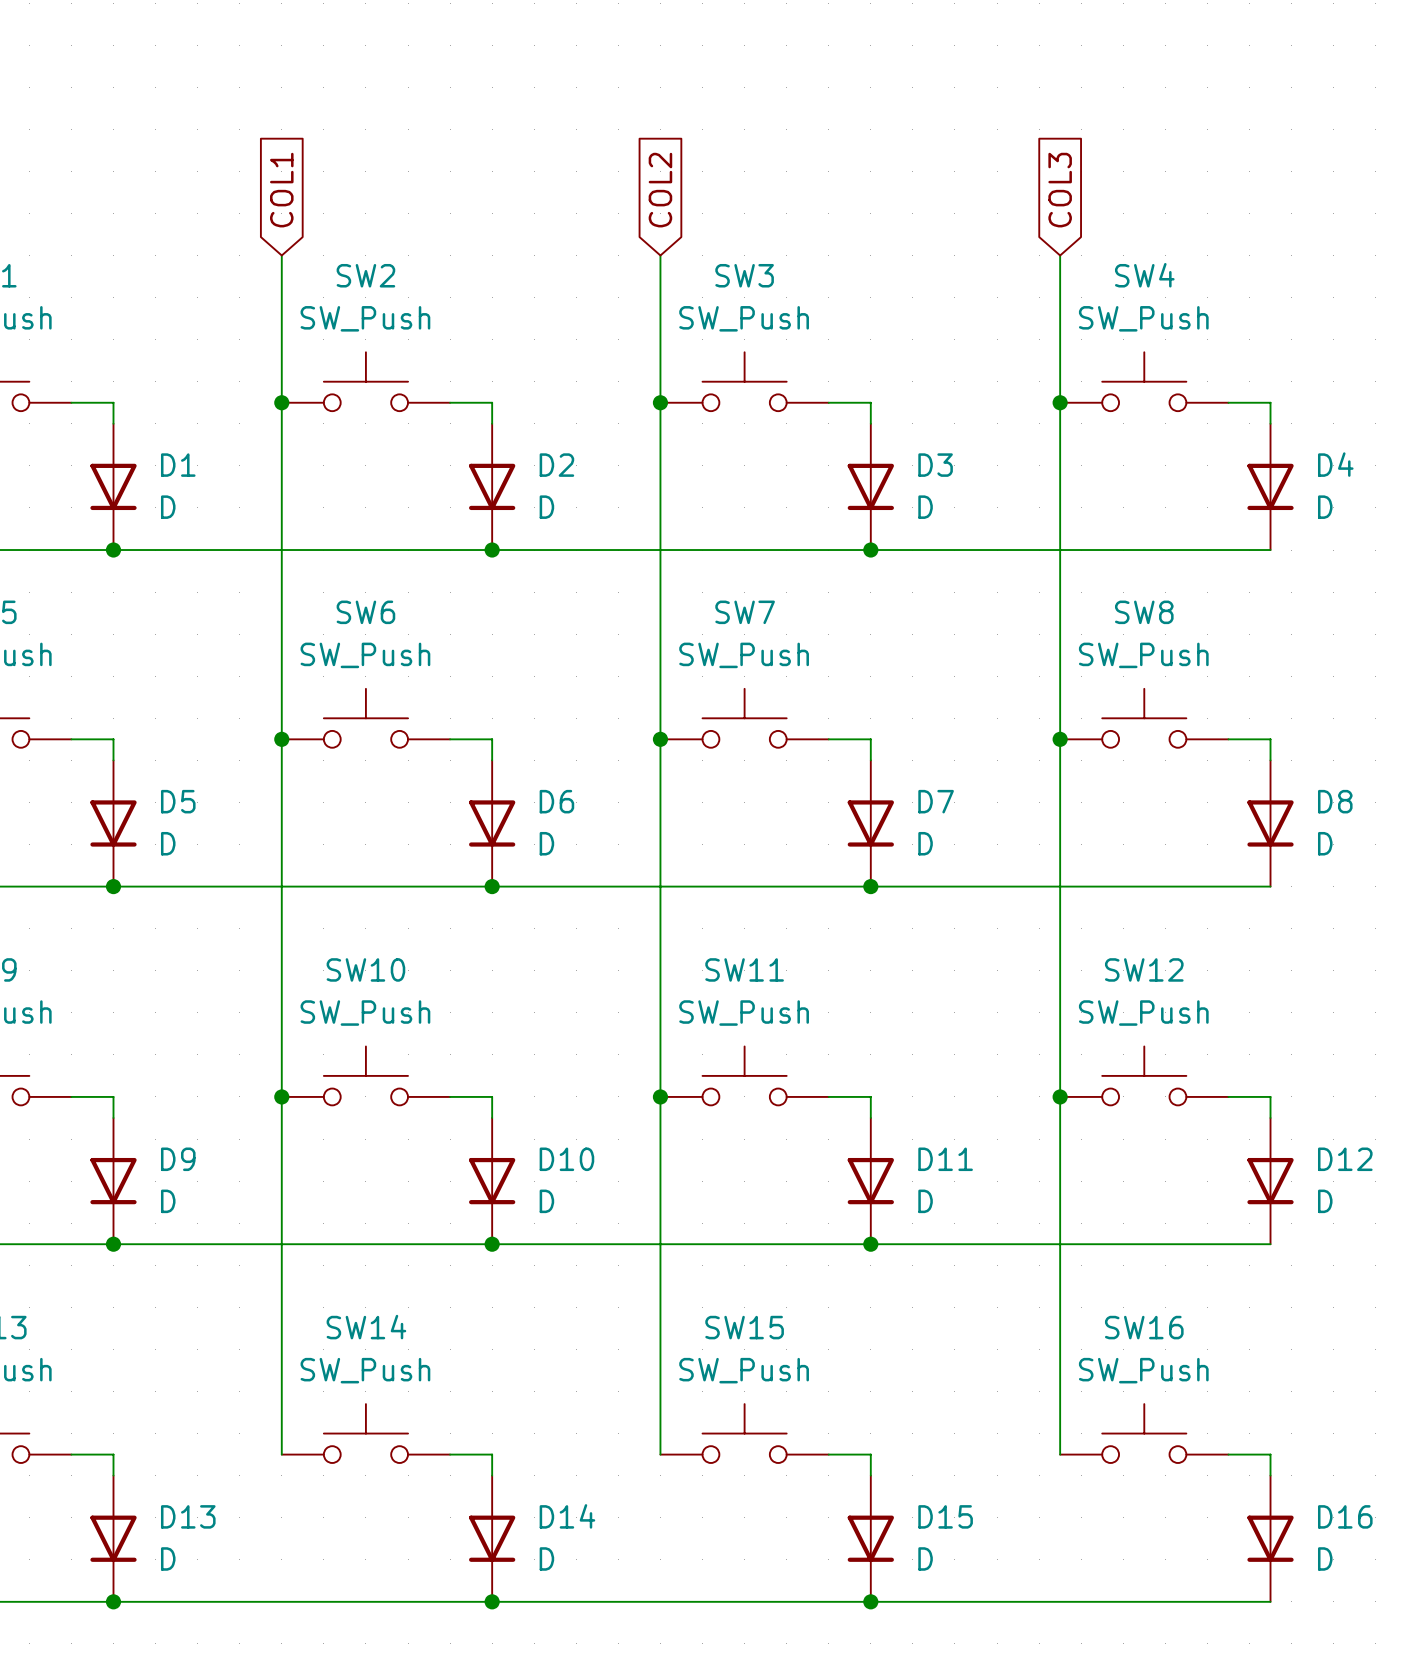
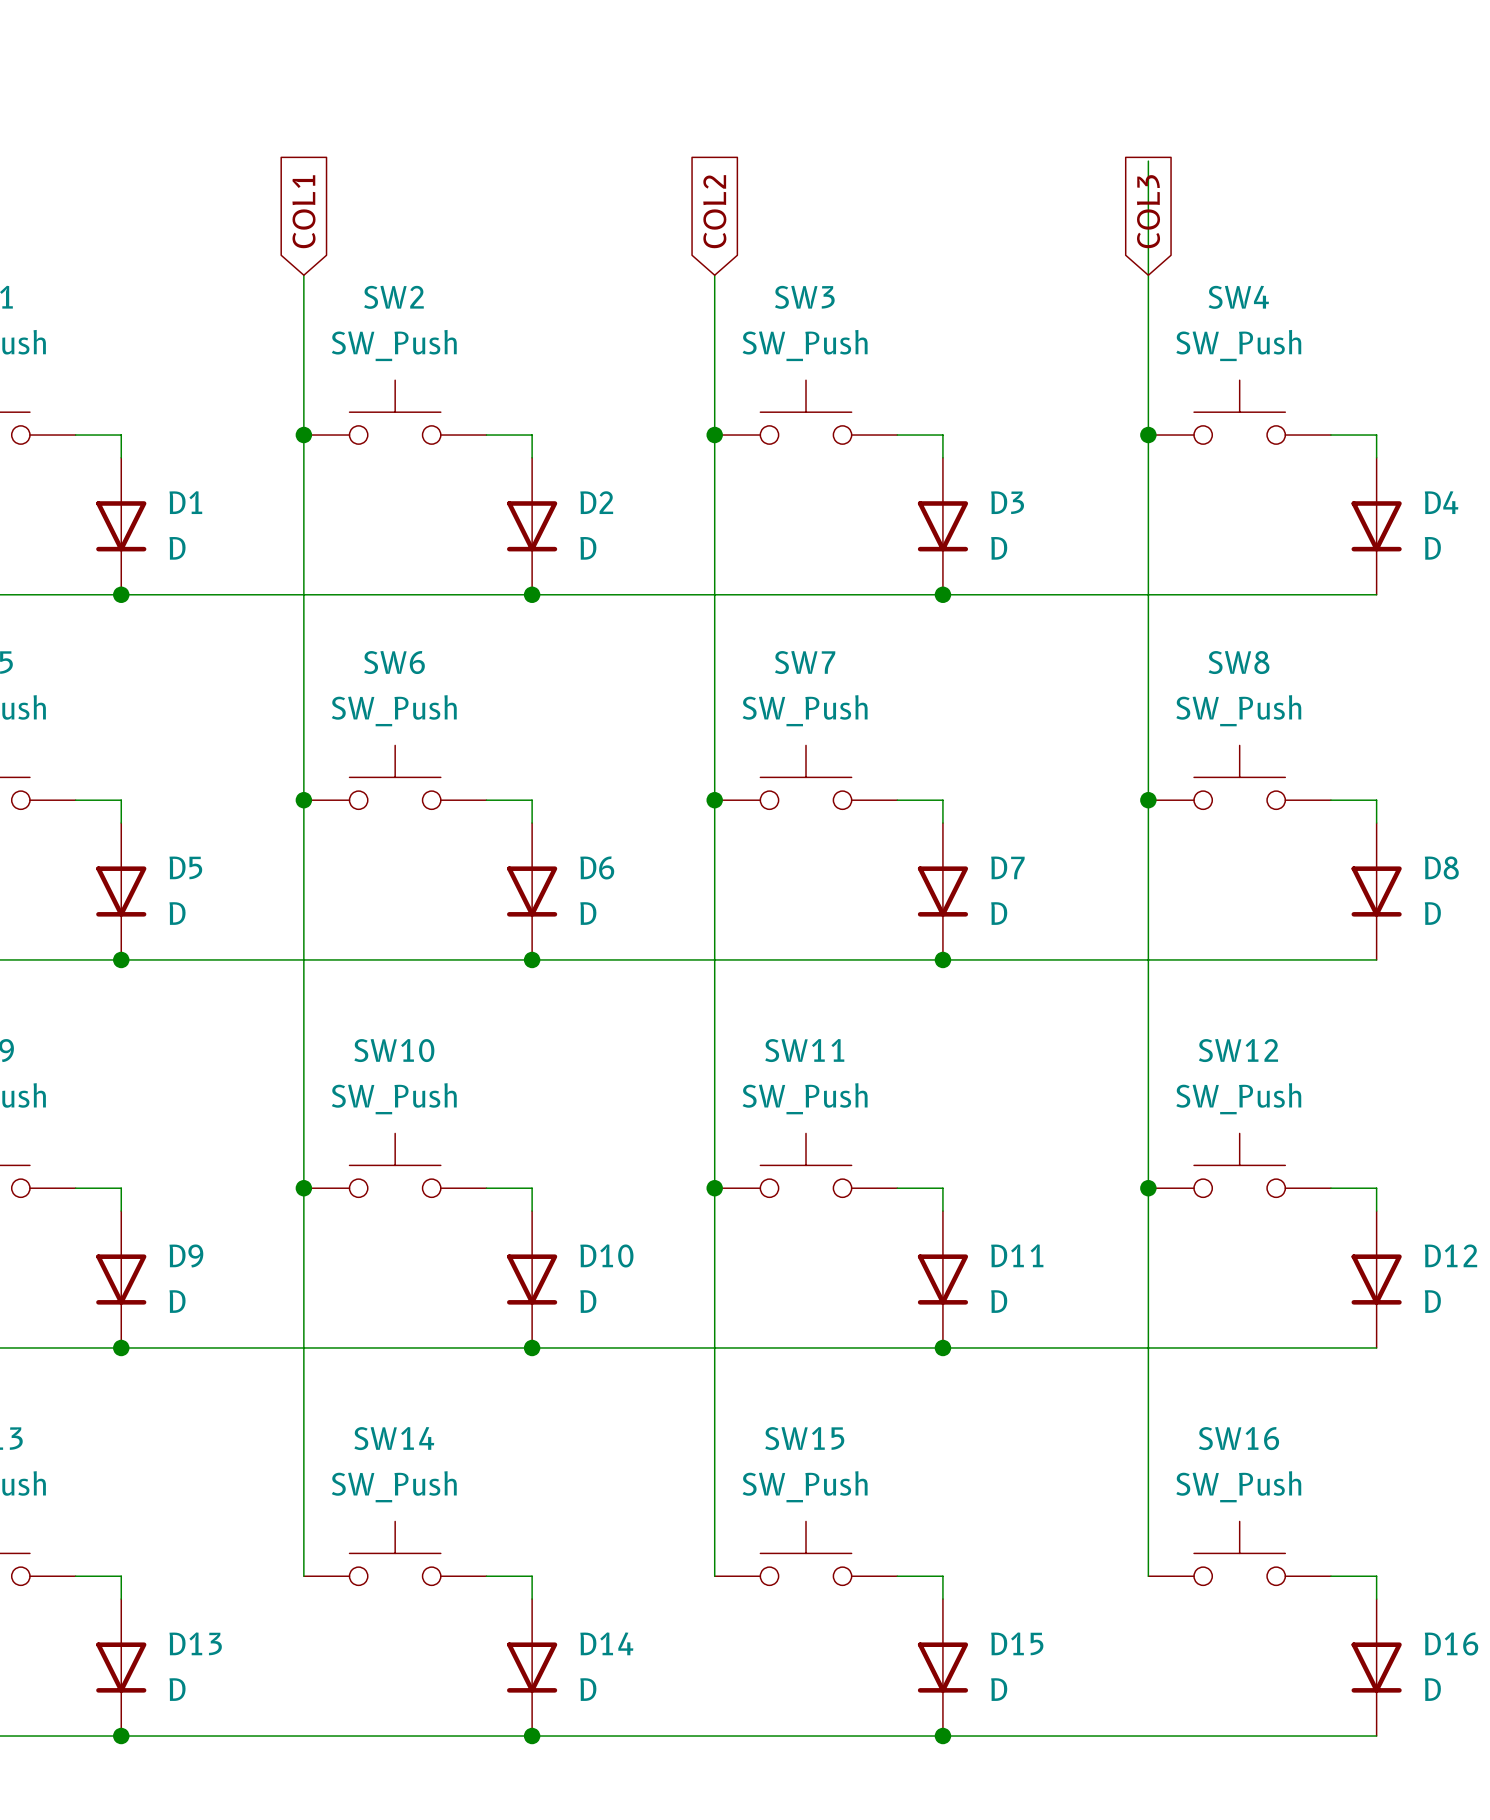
wire: none -> (1148, 161) (1148, 275)

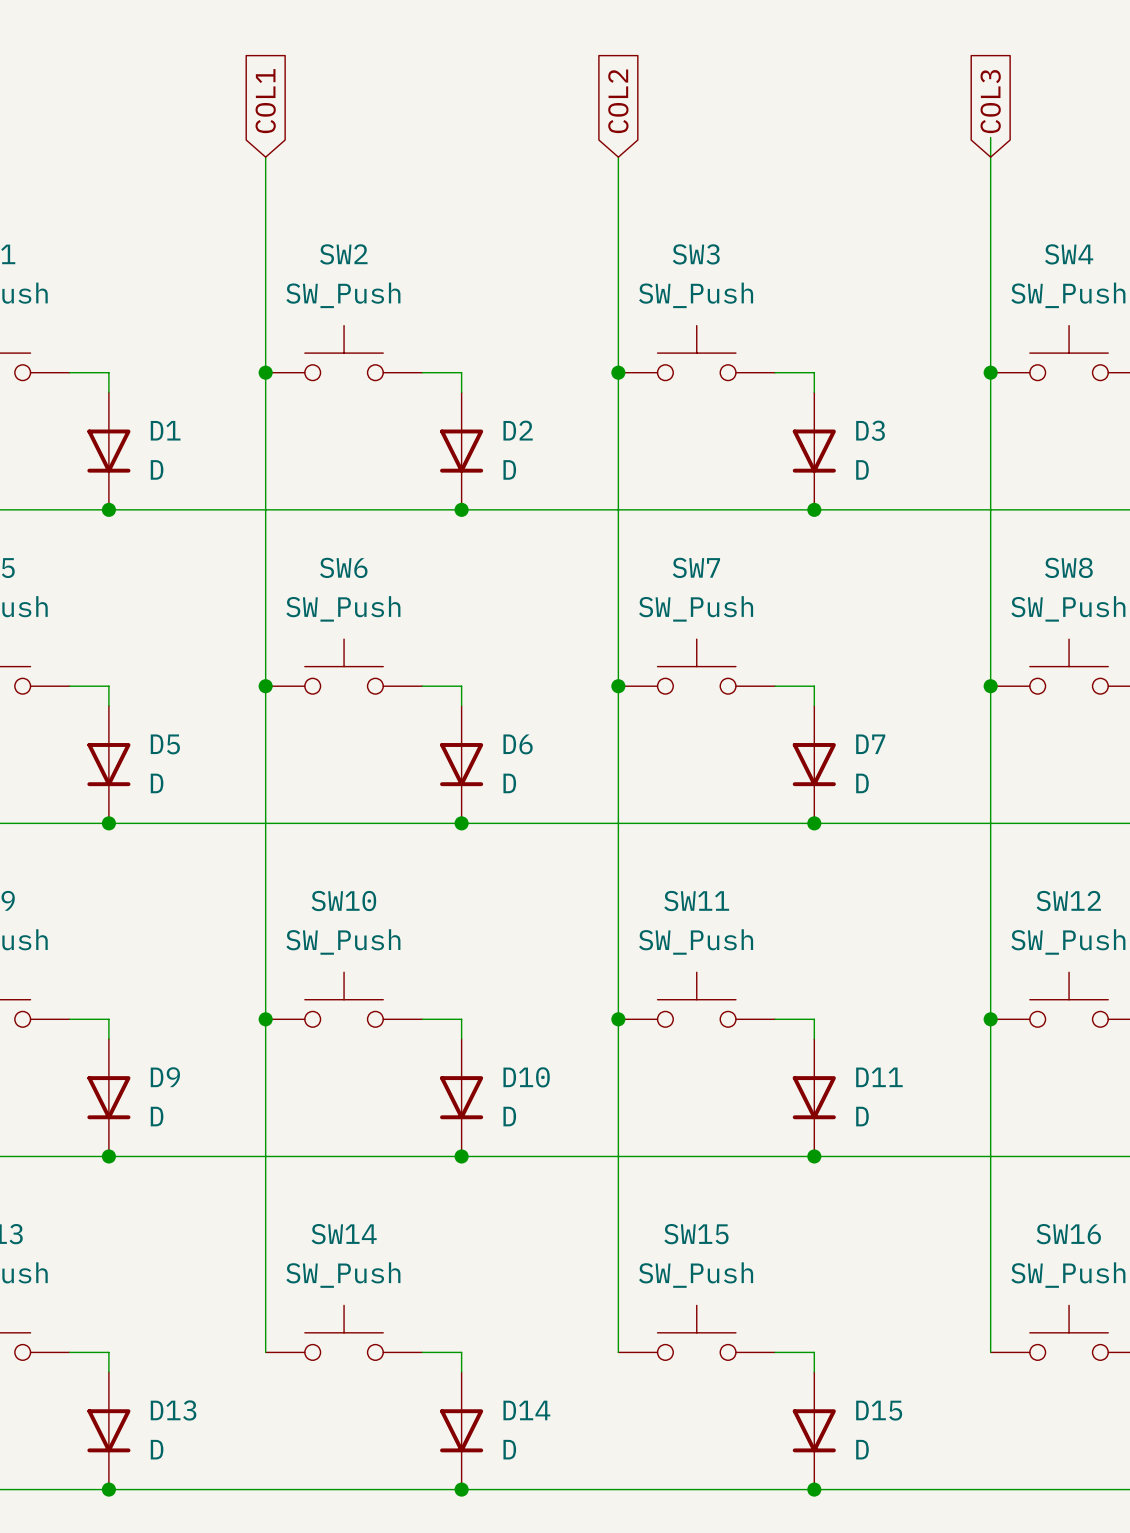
wire: none -> (265, 157) (265, 235)
wire: none -> (618, 157) (618, 235)
global label position: COL1 (303, 211) -> COL1 (265, 101)
global label position: COL2 (714, 211) -> COL2 (618, 101)
global label position: COL3 (1148, 211) -> COL3 (990, 101)

